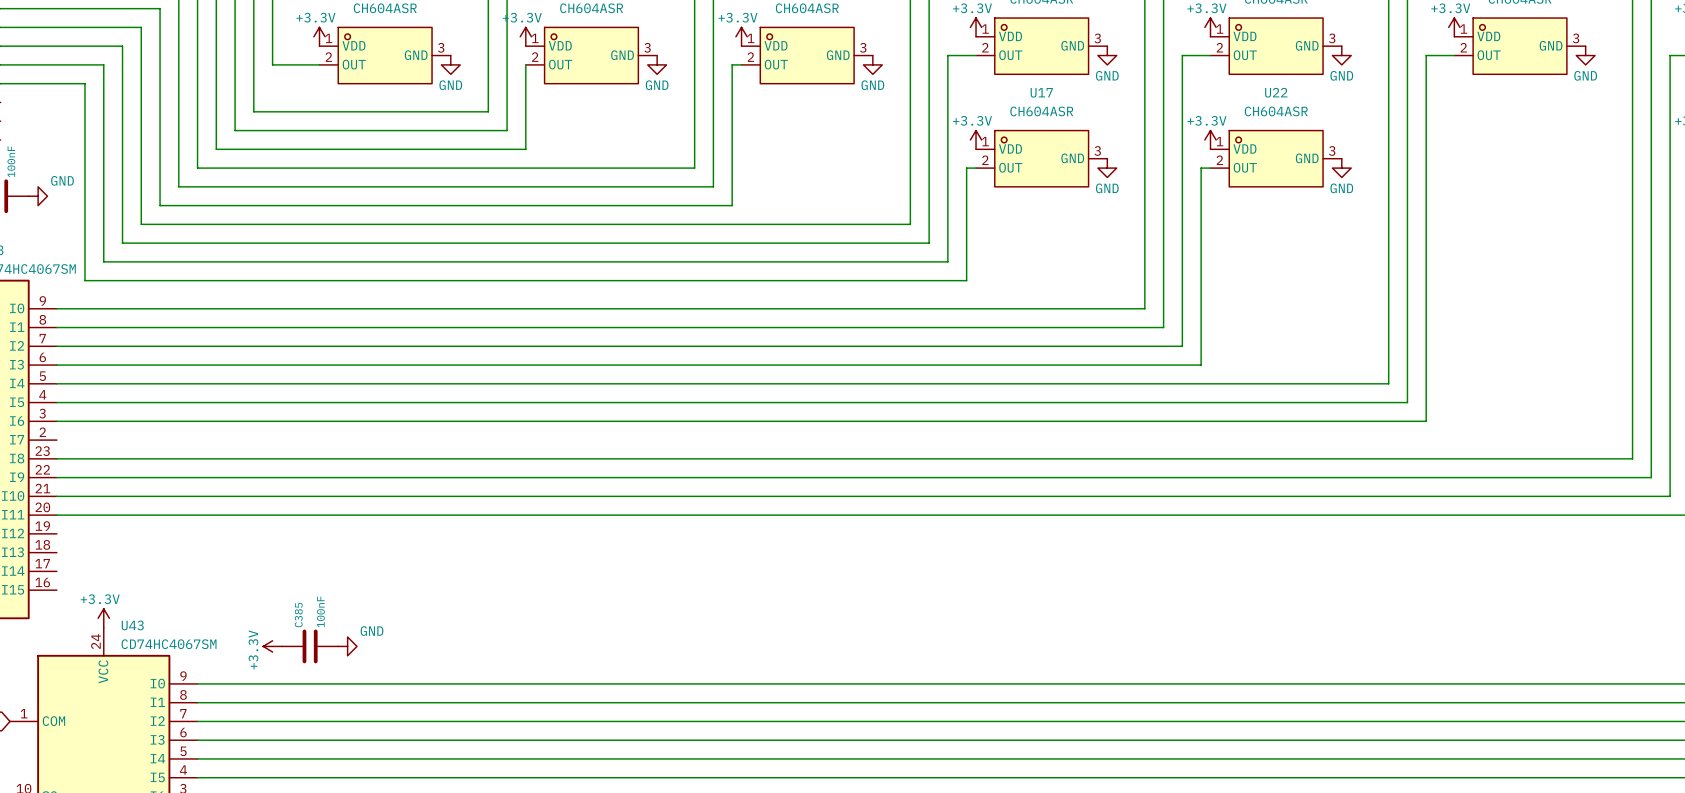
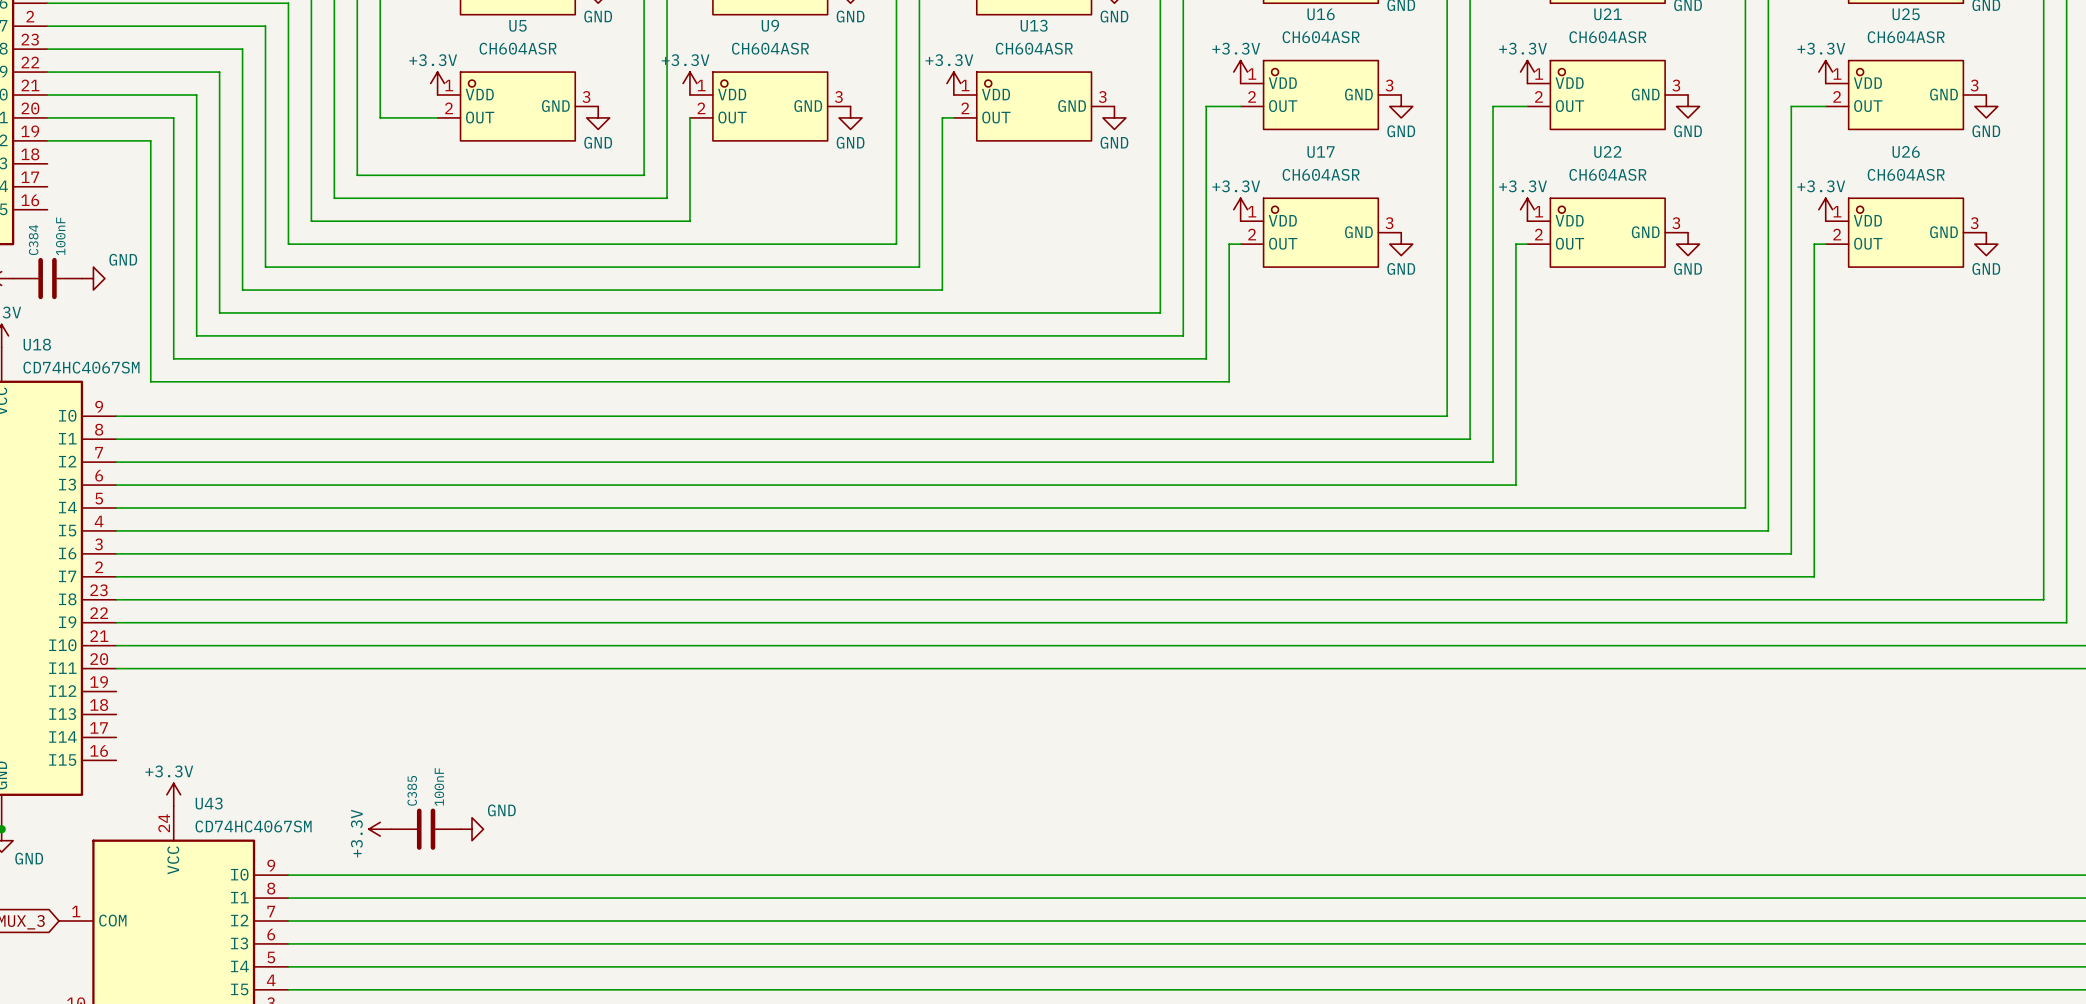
power symbol: none -> +3.3V (1825, 209)
U26: none -> CH604ASR (1906, 232)
wire: none -> (1825, 244) (1814, 244) (1814, 576) (116, 576)
power symbol: none -> GND (1986, 244)

